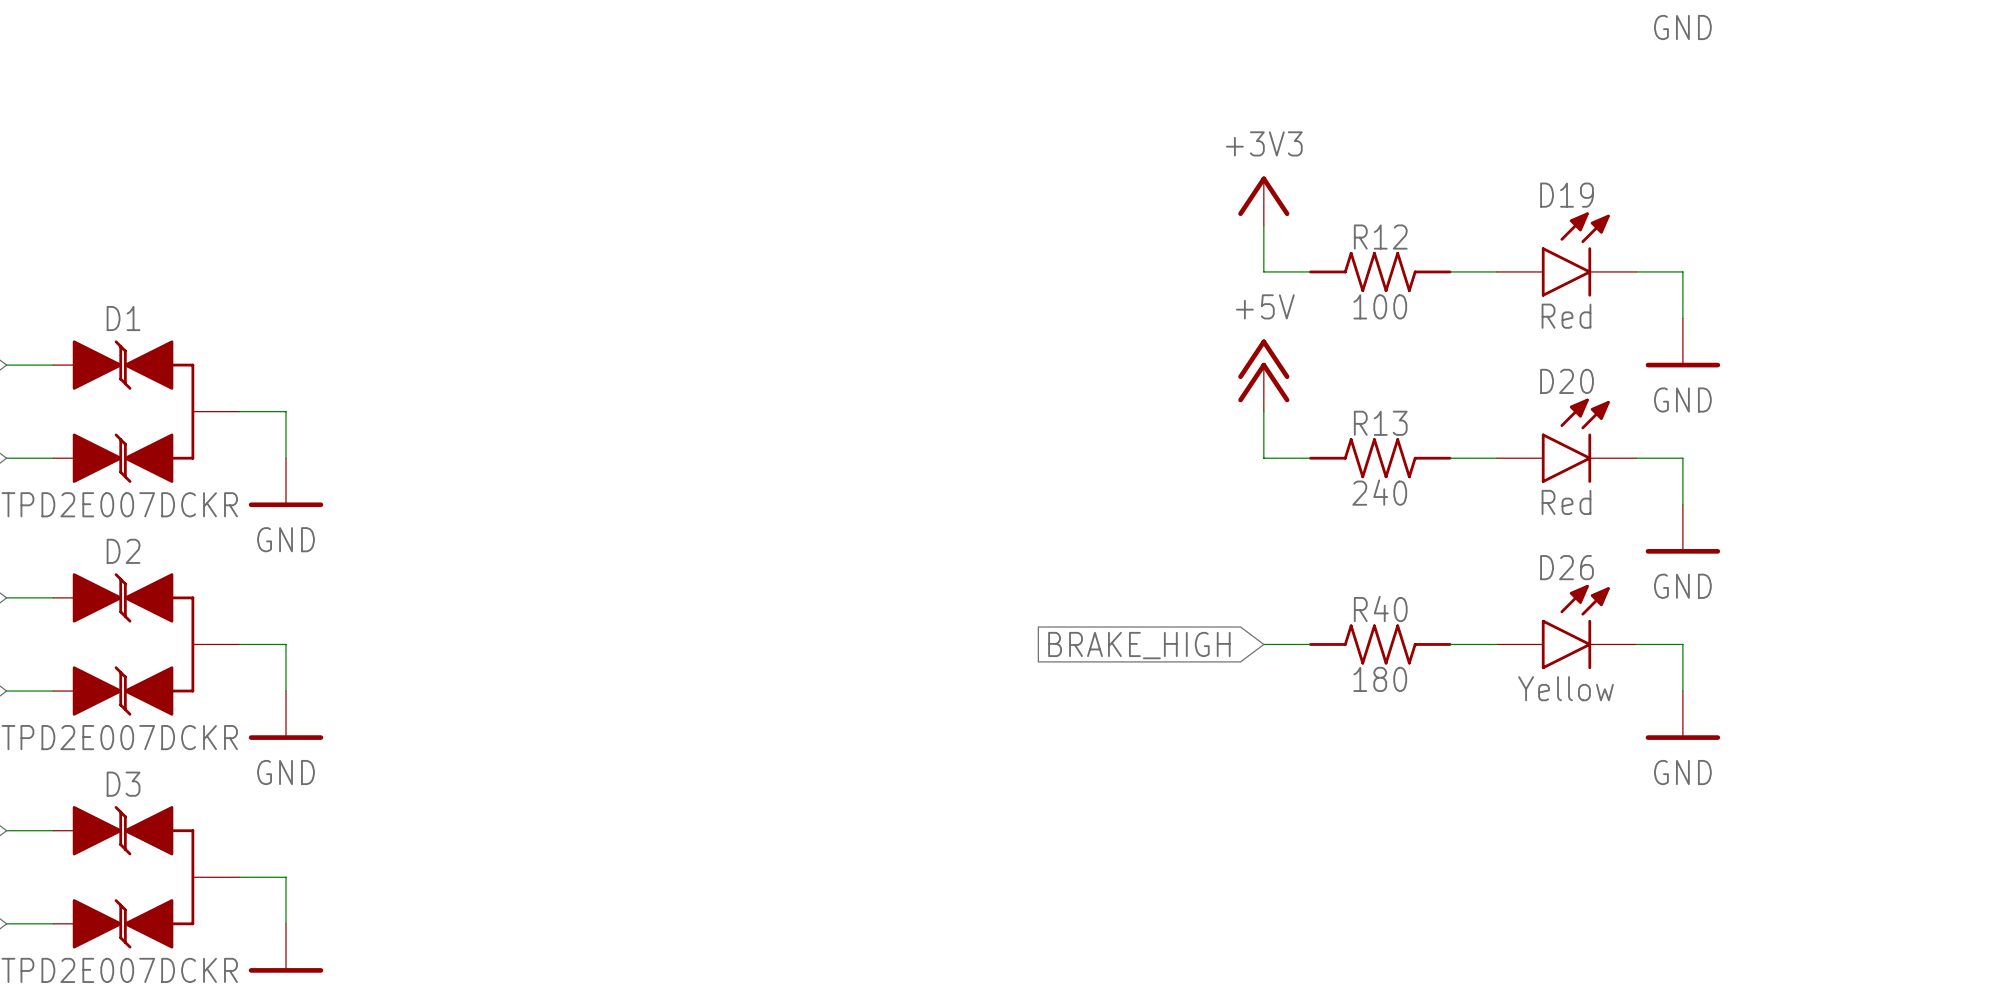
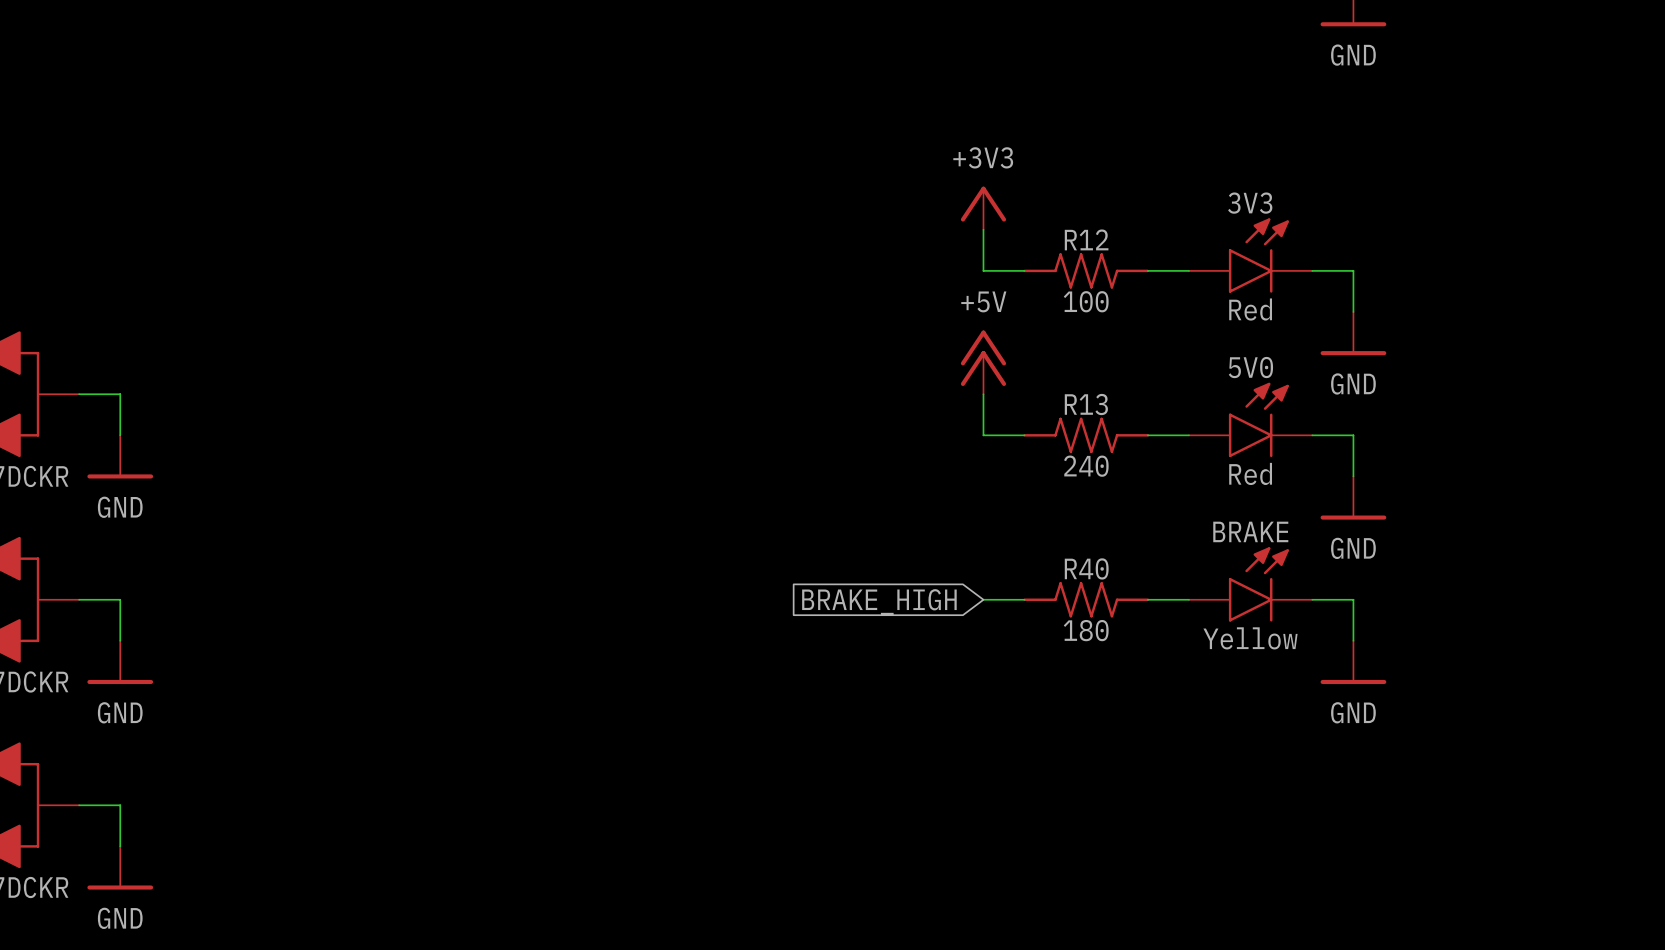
D19 name: D19 (1566, 195) -> 3V3 (1250, 203)
D20 name: D20 (1566, 381) -> 5V0 (1250, 367)
D26 name: D26 (1566, 567) -> BRAKE (1250, 531)

